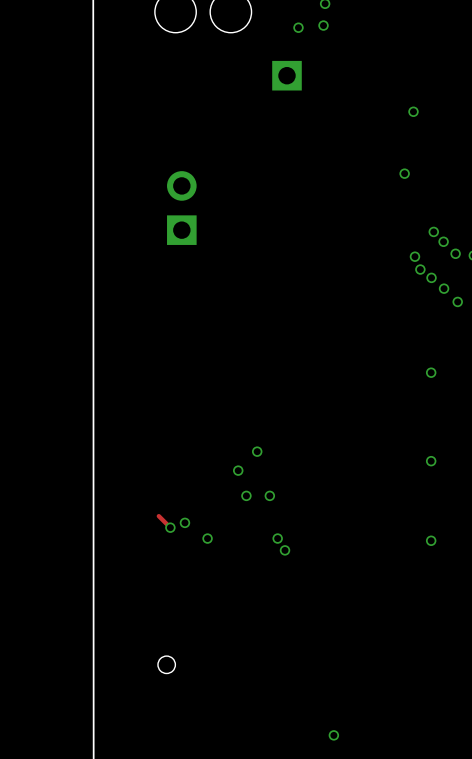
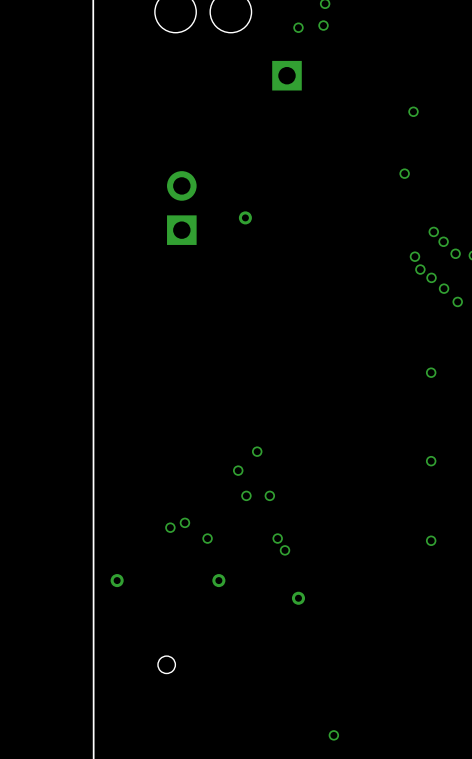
via: none -> (245, 217)
track: (158, 516) (170, 527) -> none
via: none -> (117, 580)
via: none -> (218, 580)
via: none -> (298, 598)

